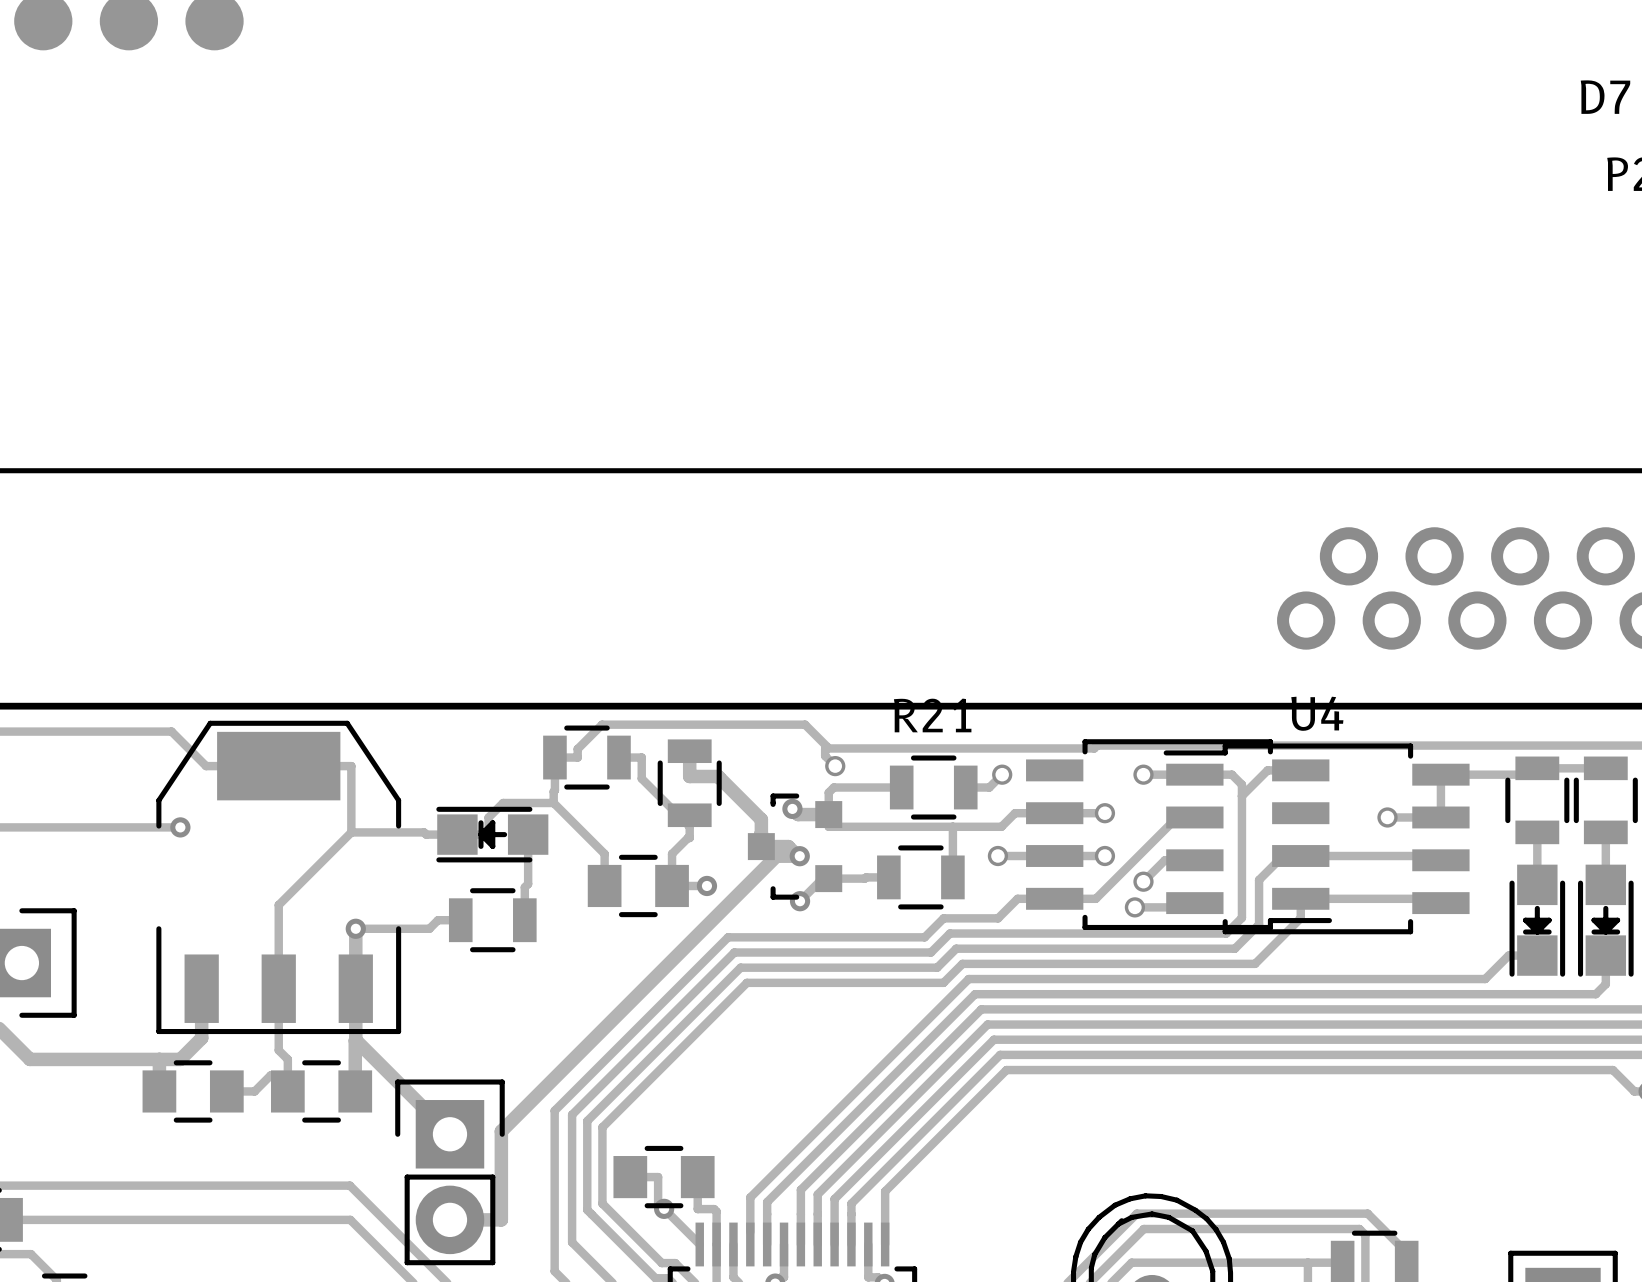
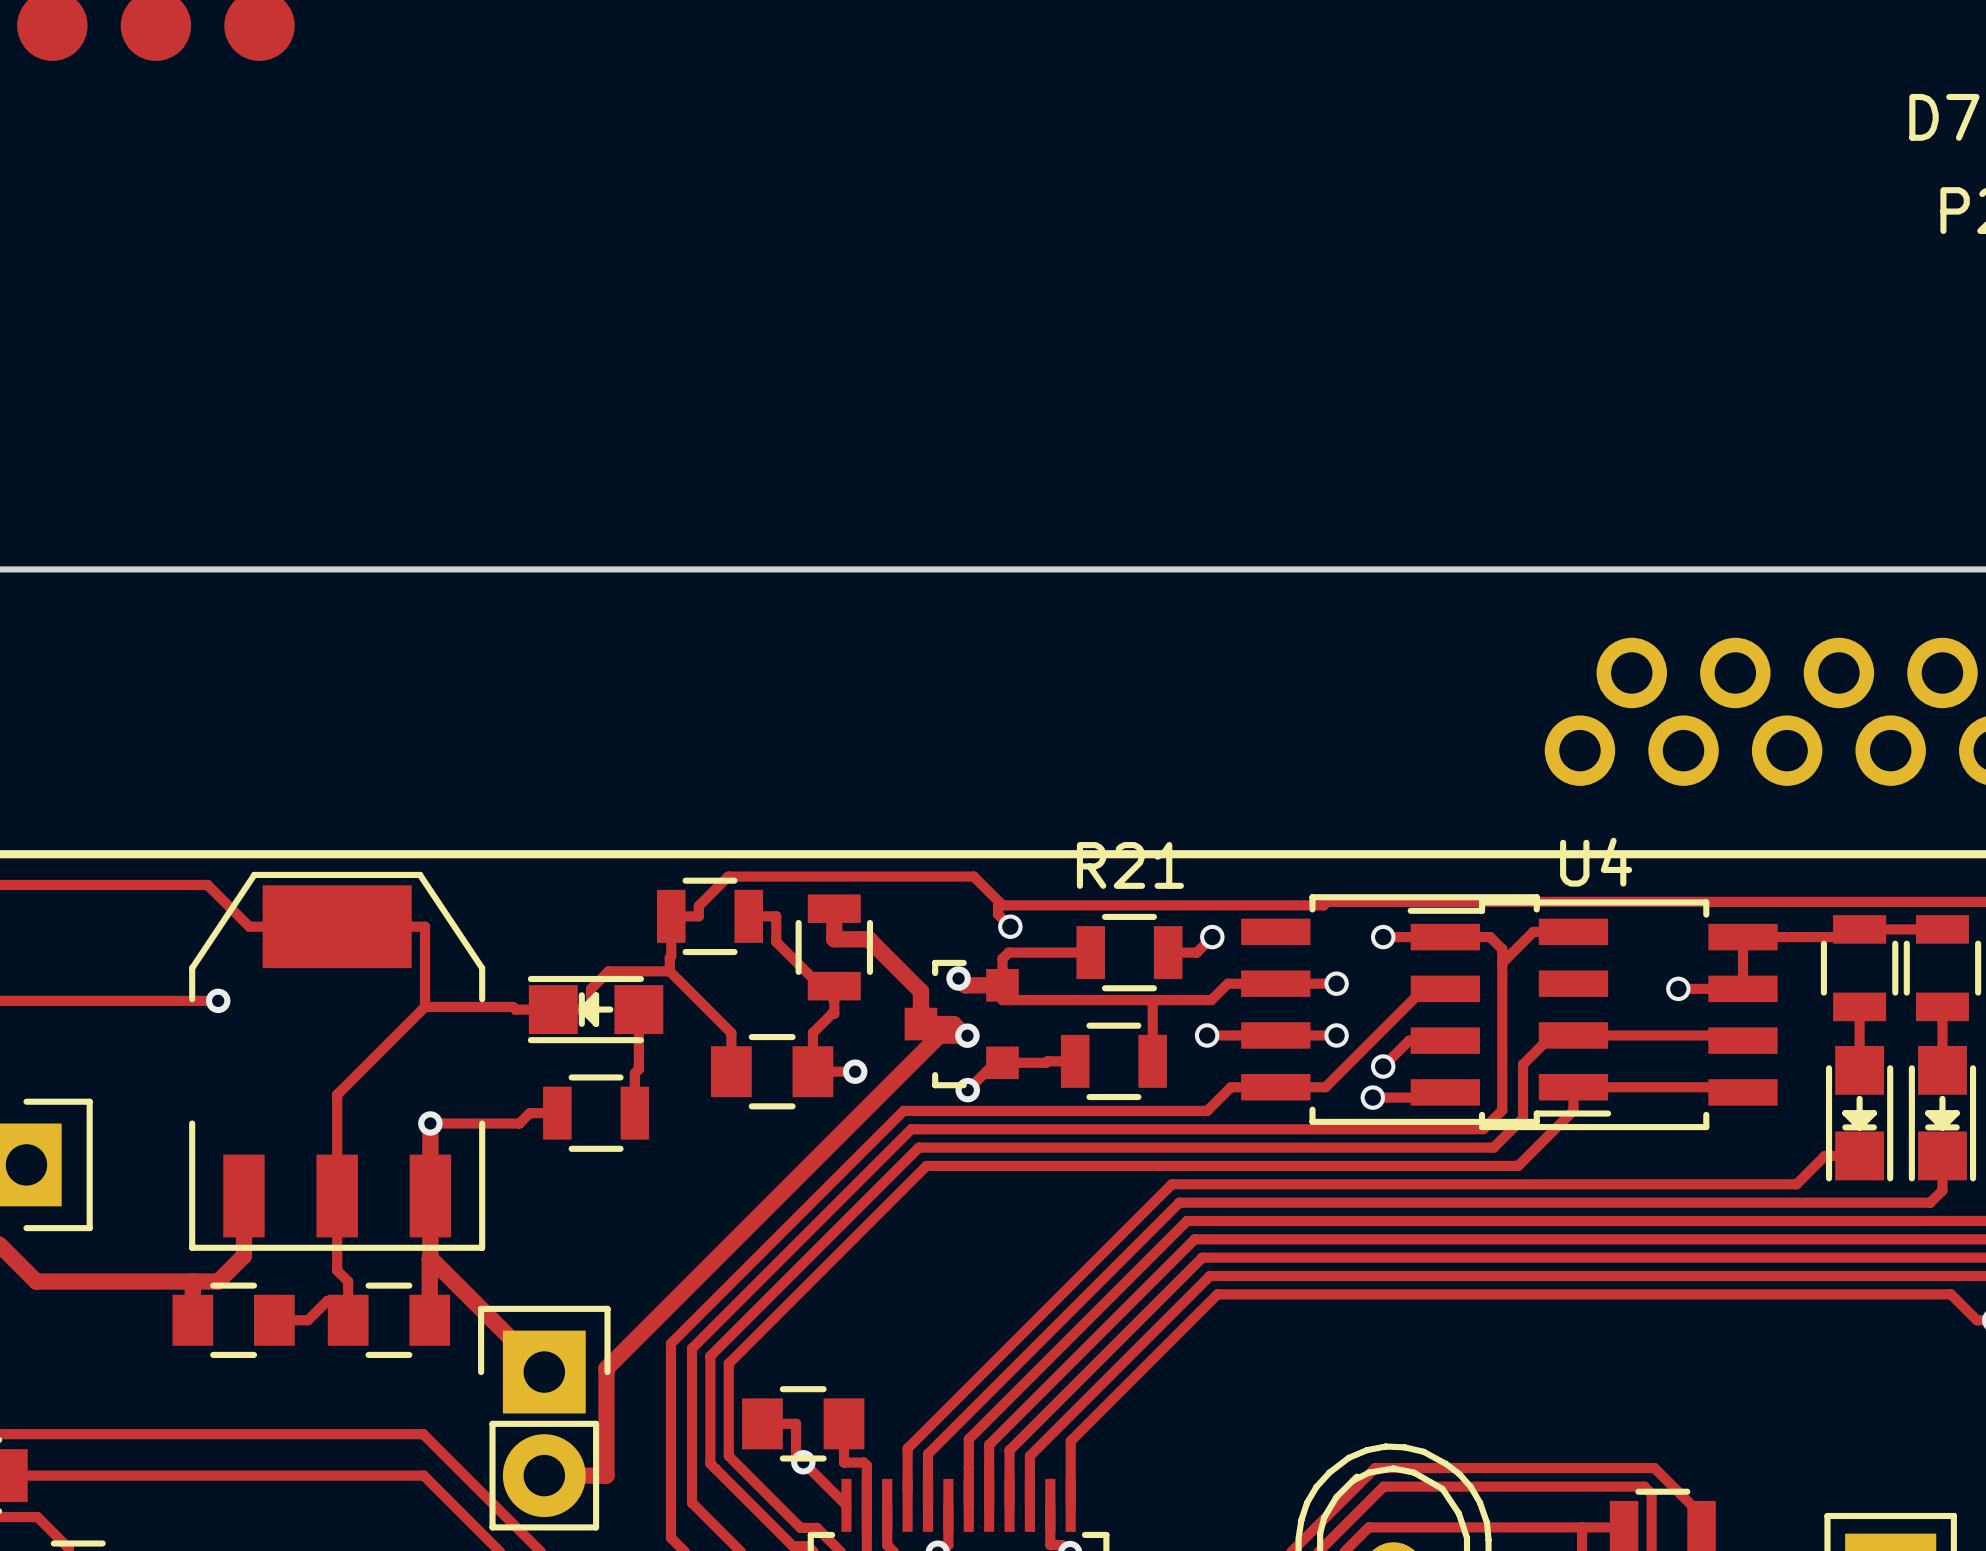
track: (943, 918) (924, 937) (728, 937) -> (1141, 1110) (903, 1110) (880, 1133)
track: (949, 933) (930, 952) (734, 952) -> (1149, 1129) (911, 1129) (888, 1152)
track: (956, 948) (937, 967) (740, 967) -> (1156, 1147) (918, 1147) (895, 1170)
track: (962, 963) (943, 982) (746, 982) -> (1164, 1165) (926, 1165) (903, 1188)

